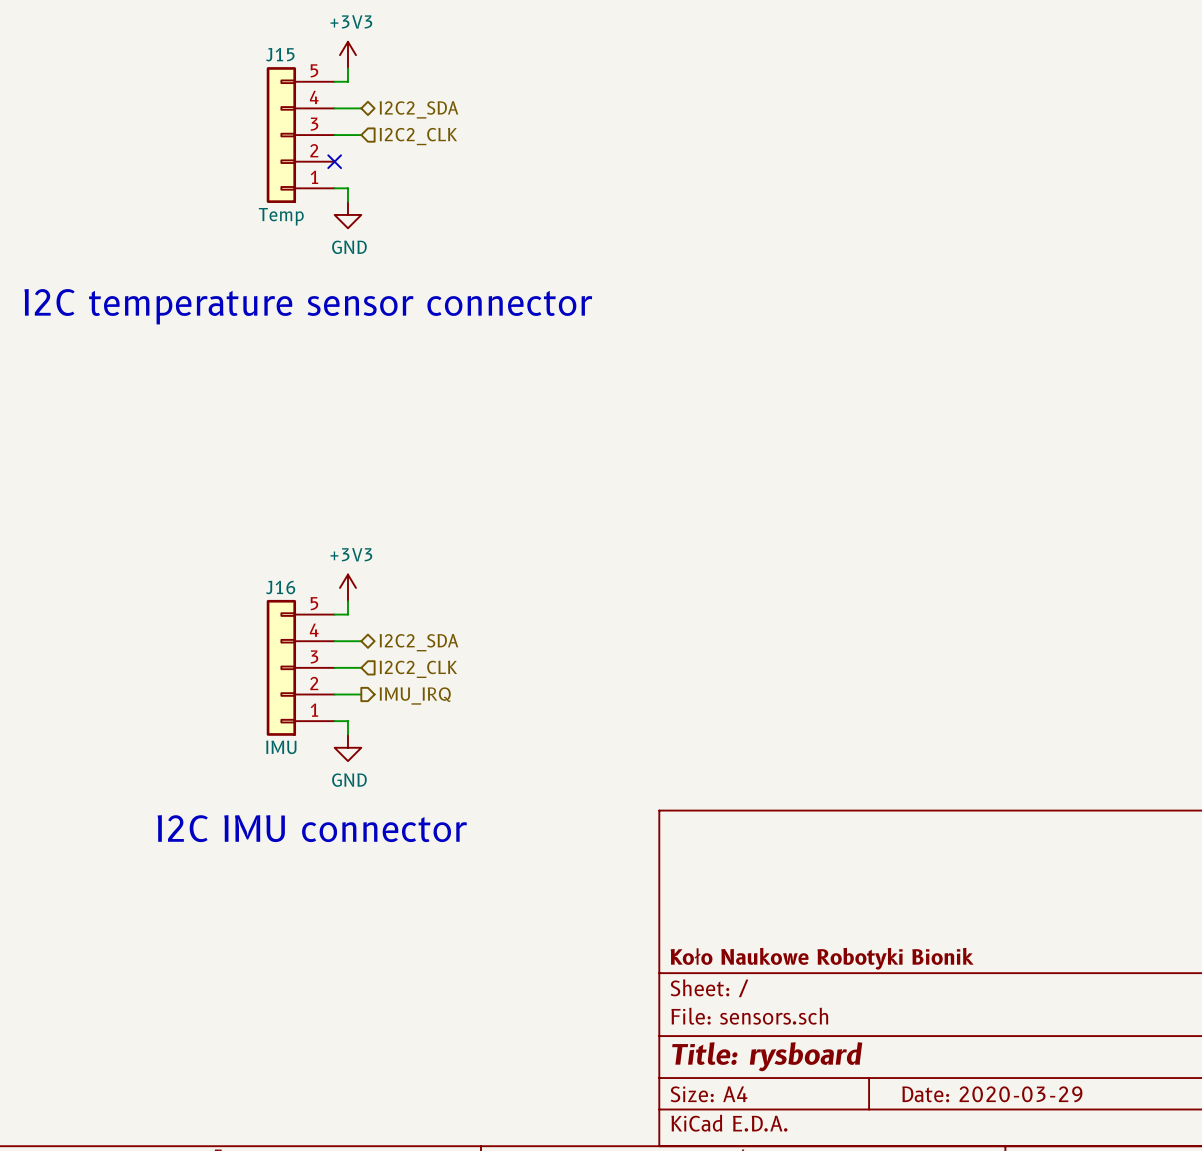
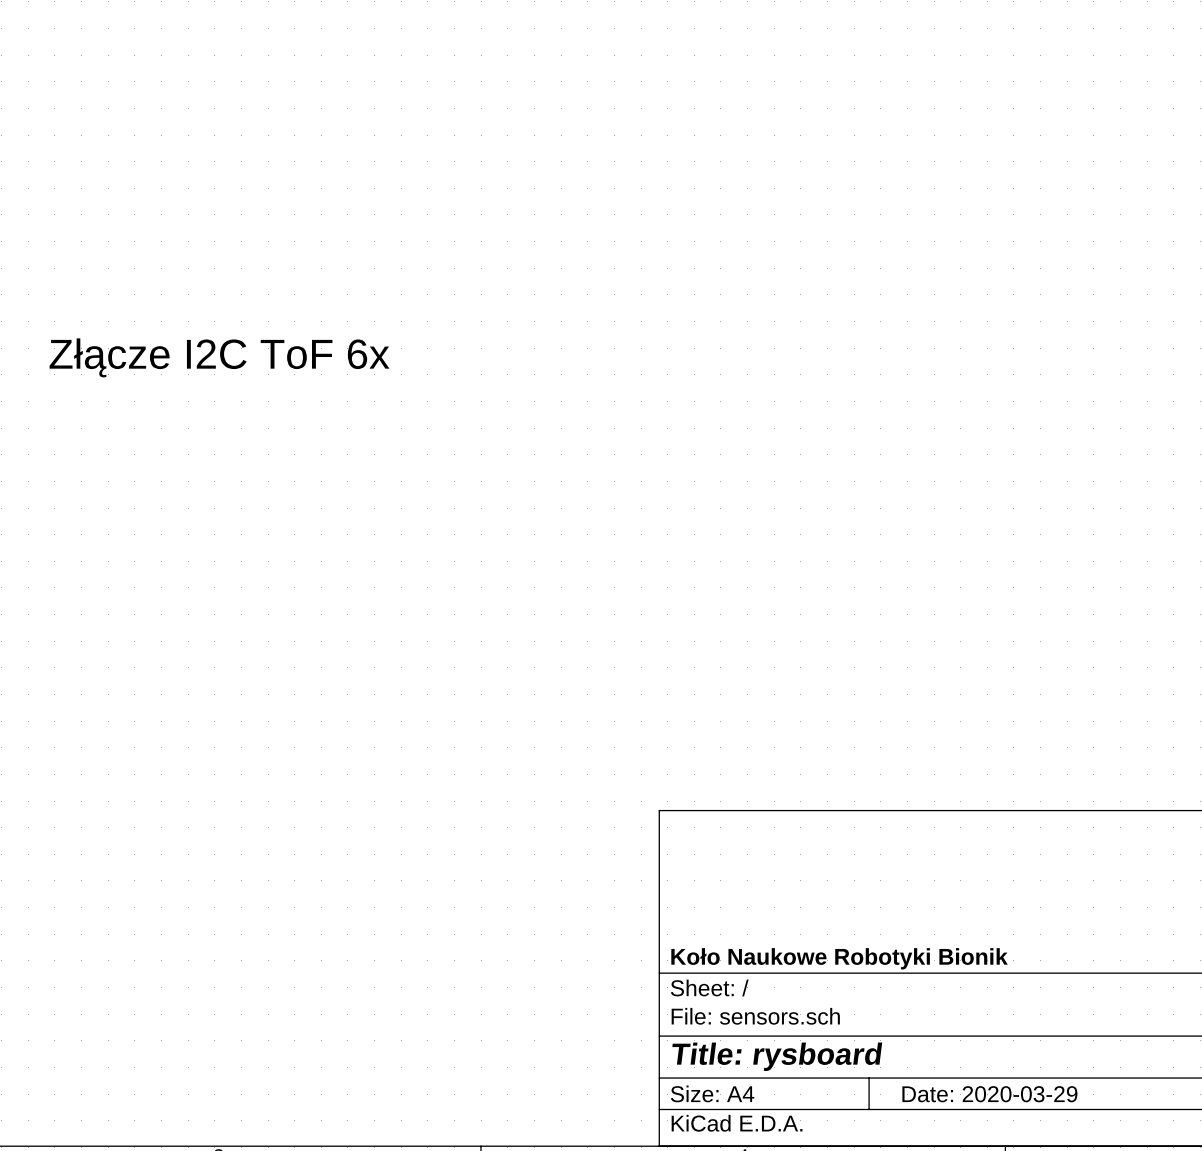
power symbol: +3V3 (347, 55) -> none
wire: (347, 68) (347, 81) (334, 81) -> none
wire: (334, 108) (361, 108) -> none
hierarchical label: I2C2_SDA (418, 109) -> none
J15: Temp (300, 135) -> none
wire: (334, 135) (361, 135) -> none
hierarchical label: I2C2_CLK (418, 136) -> none
no-connect mark: (334, 161) -> none
wire: (334, 188) (347, 188) (347, 201) -> none
power symbol: GND (347, 214) -> none
text: I2C temperature sensor connector (308, 306) -> none
text: none -> Złącze I2C ToF 6x (219, 357)
power symbol: +3V3 (347, 587) -> none
wire: (347, 601) (347, 614) (334, 614) -> none
wire: (334, 641) (361, 641) -> none
hierarchical label: I2C2_SDA (418, 642) -> none
J16: IMU (300, 667) -> none
wire: (334, 667) (361, 667) -> none
hierarchical label: I2C2_CLK (418, 669) -> none
wire: (334, 694) (361, 694) -> none
hierarchical label: IMU_IRQ (415, 695) -> none
wire: (334, 721) (347, 721) (347, 734) -> none
power symbol: GND (347, 747) -> none
text: I2C IMU connector (312, 828) -> none

